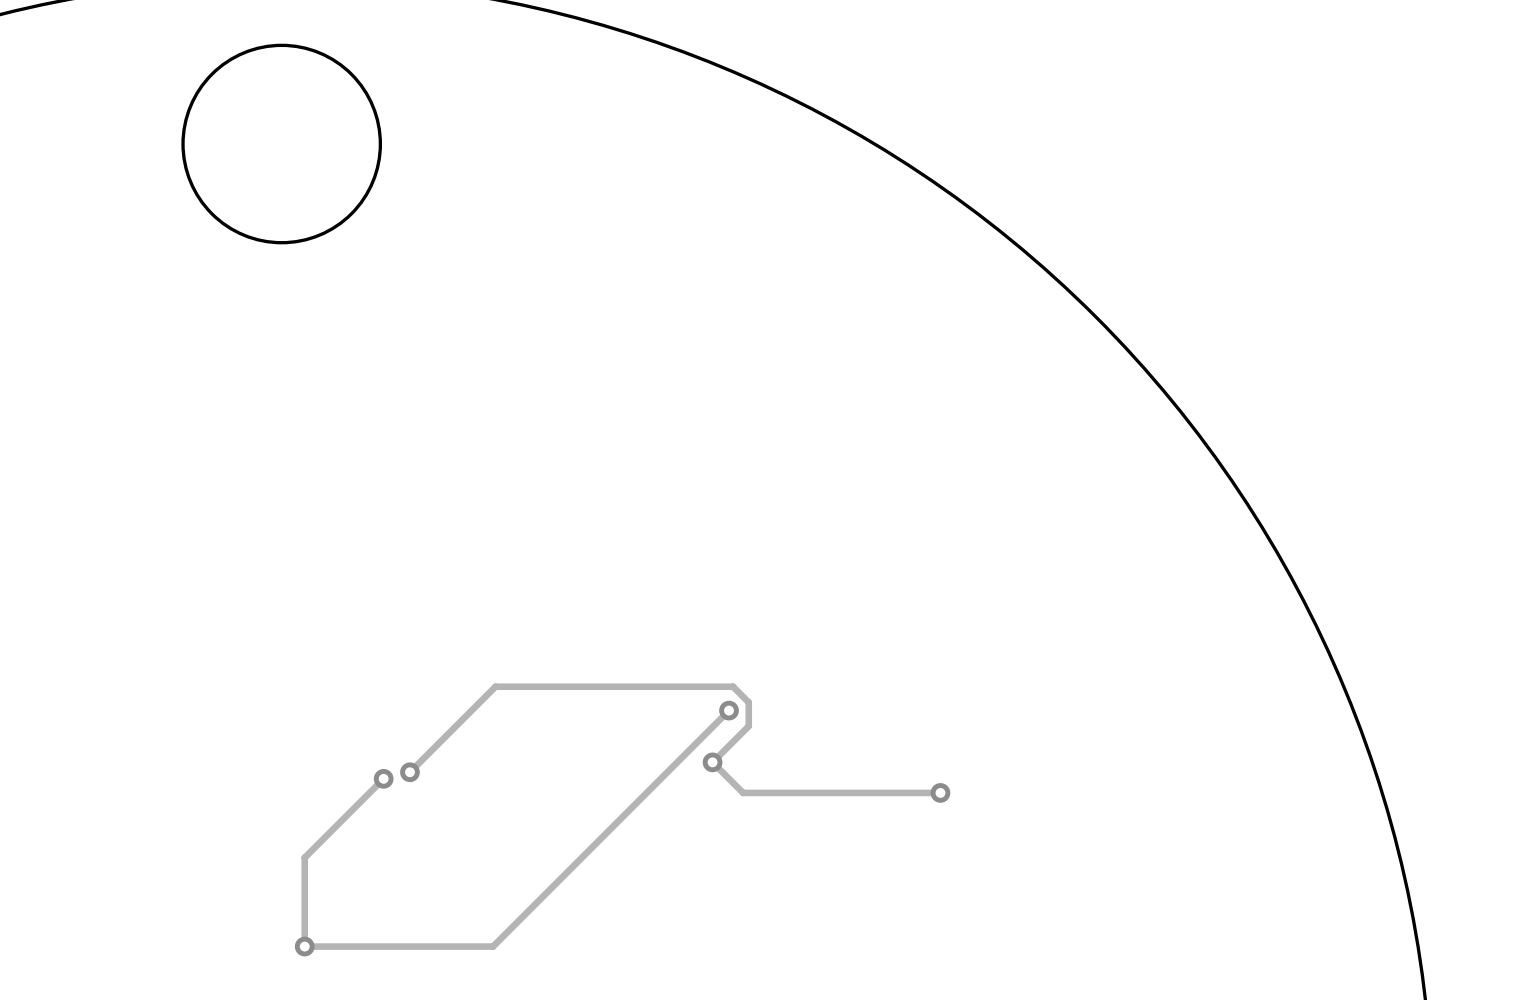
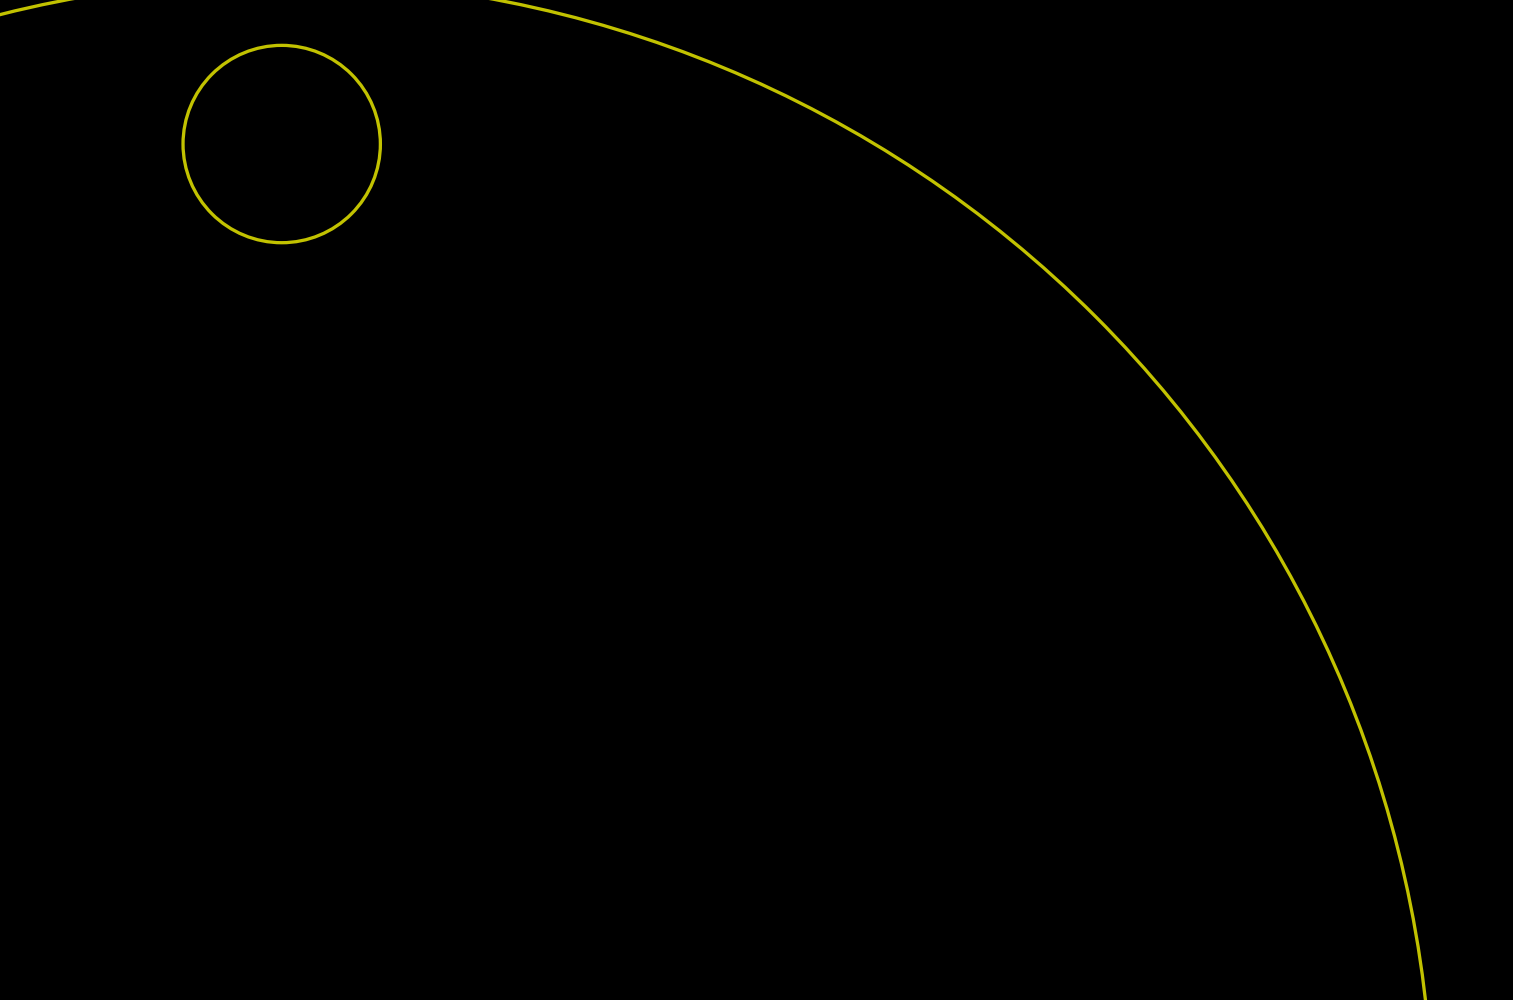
track: (729, 710) (493, 946) (304, 946) (304, 857) (383, 778) -> none
via: (729, 710) -> none
via: (712, 762) -> none
track: (409, 772) (495, 686) (733, 686) (748, 702) (748, 726) (712, 762) (743, 792) (940, 792) -> none
via: (409, 772) -> none
via: (383, 778) -> none
via: (940, 792) -> none
via: (304, 946) -> none

